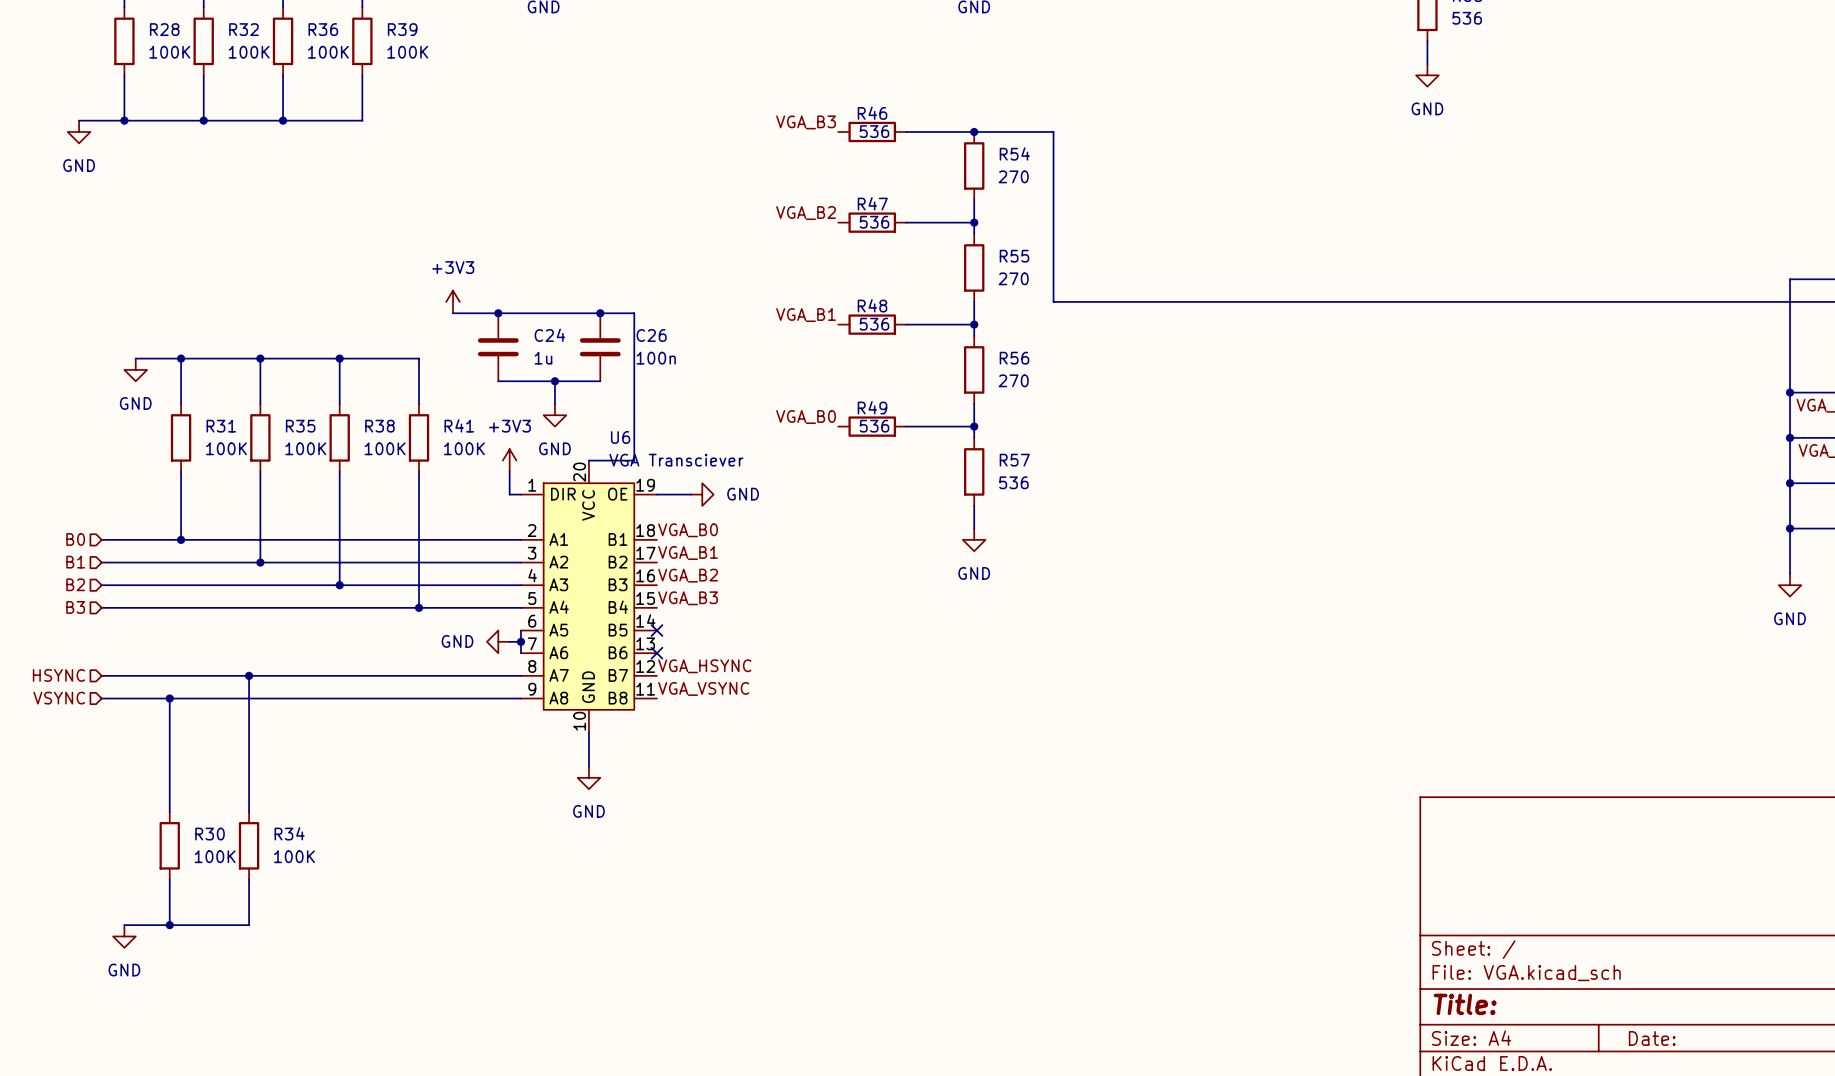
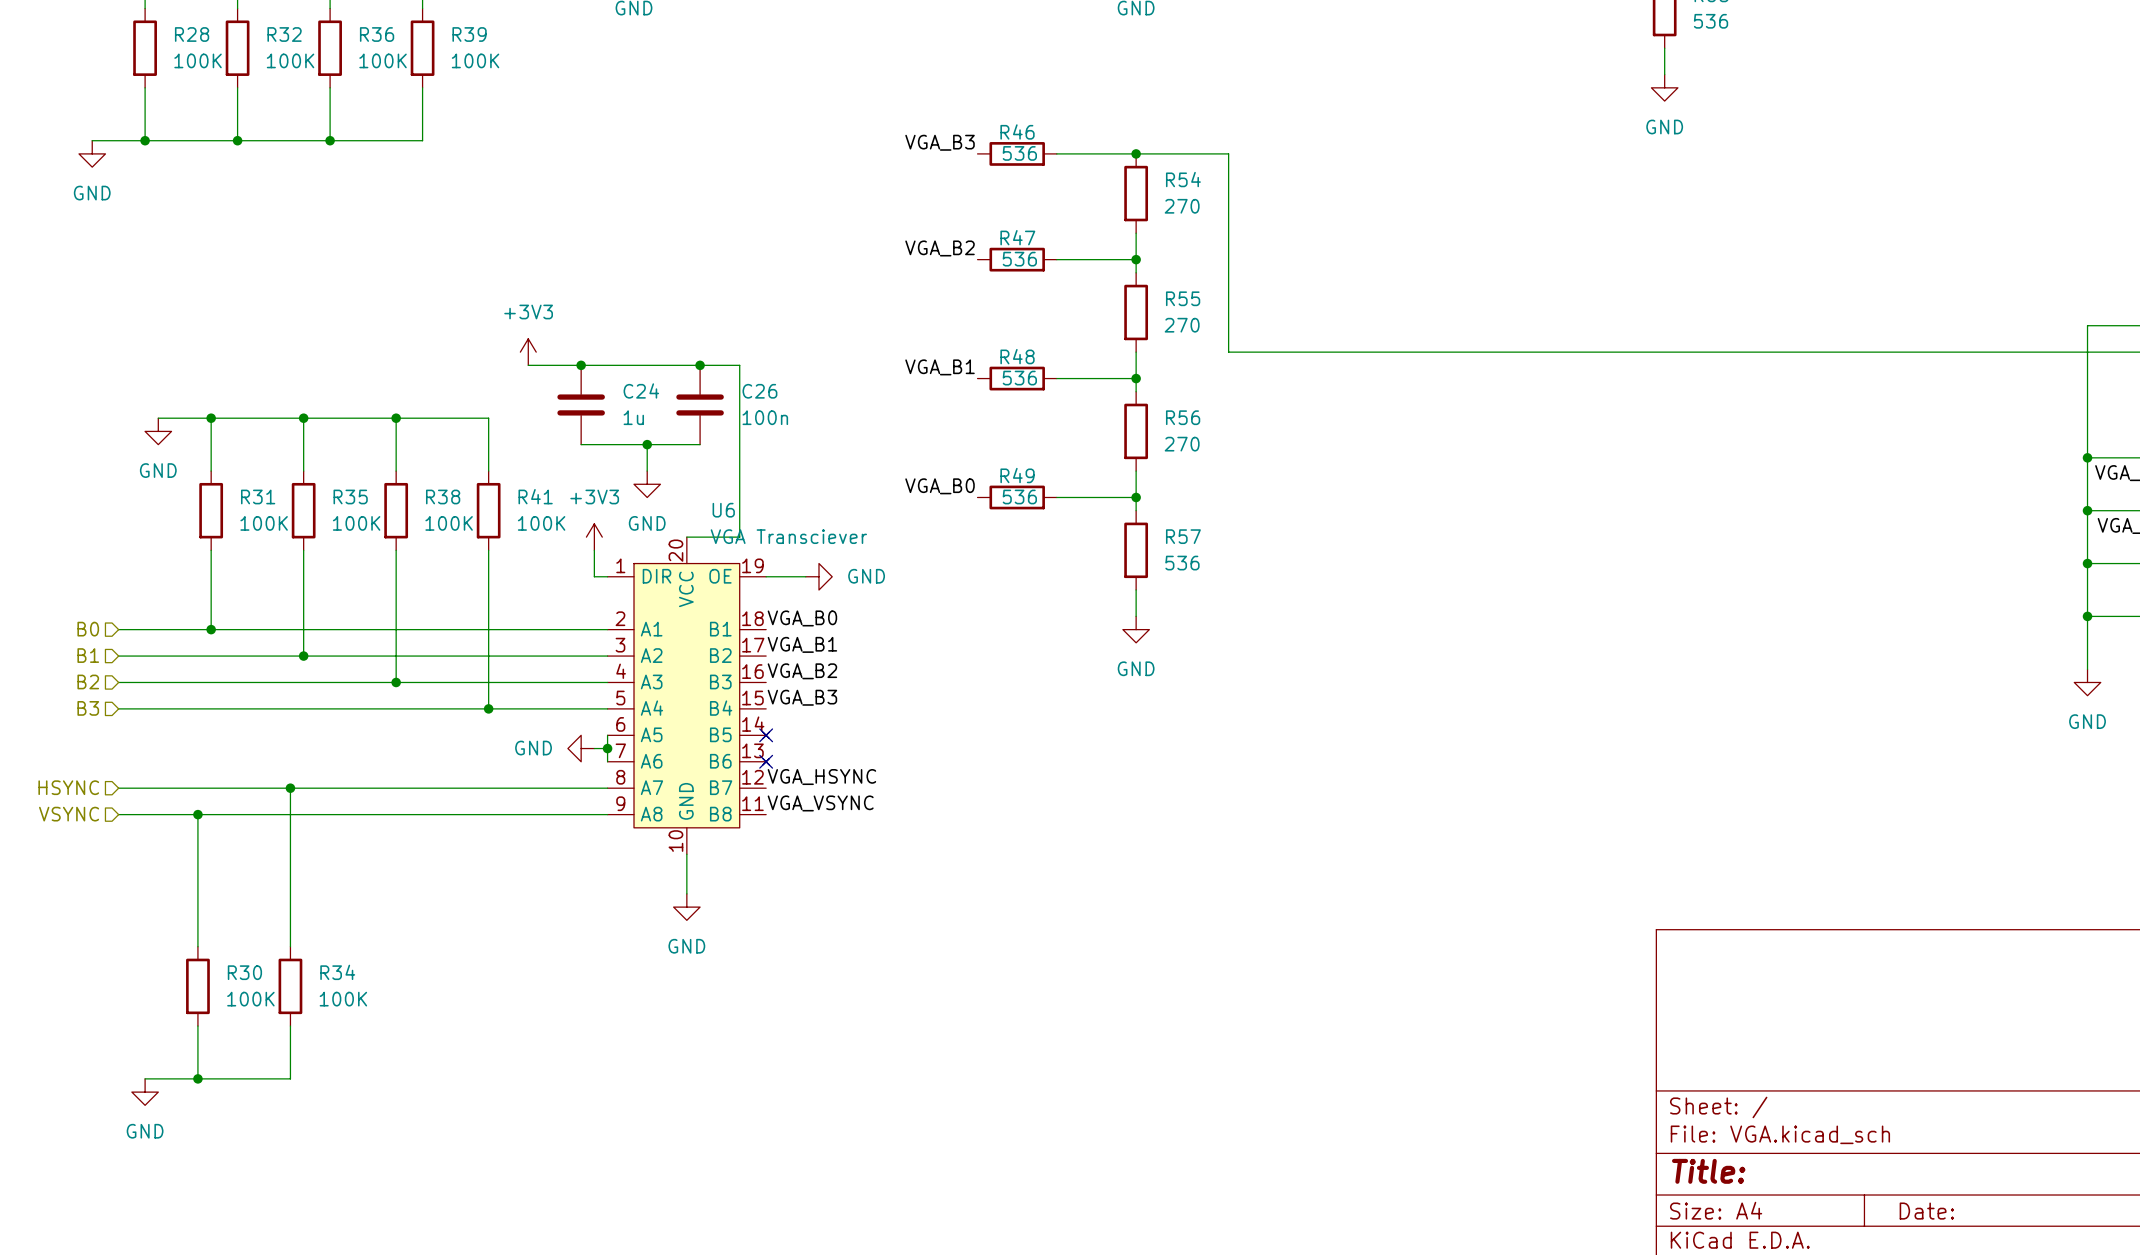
U6 symbol: [520, 460, 657, 733] -> [607, 537, 770, 855]

